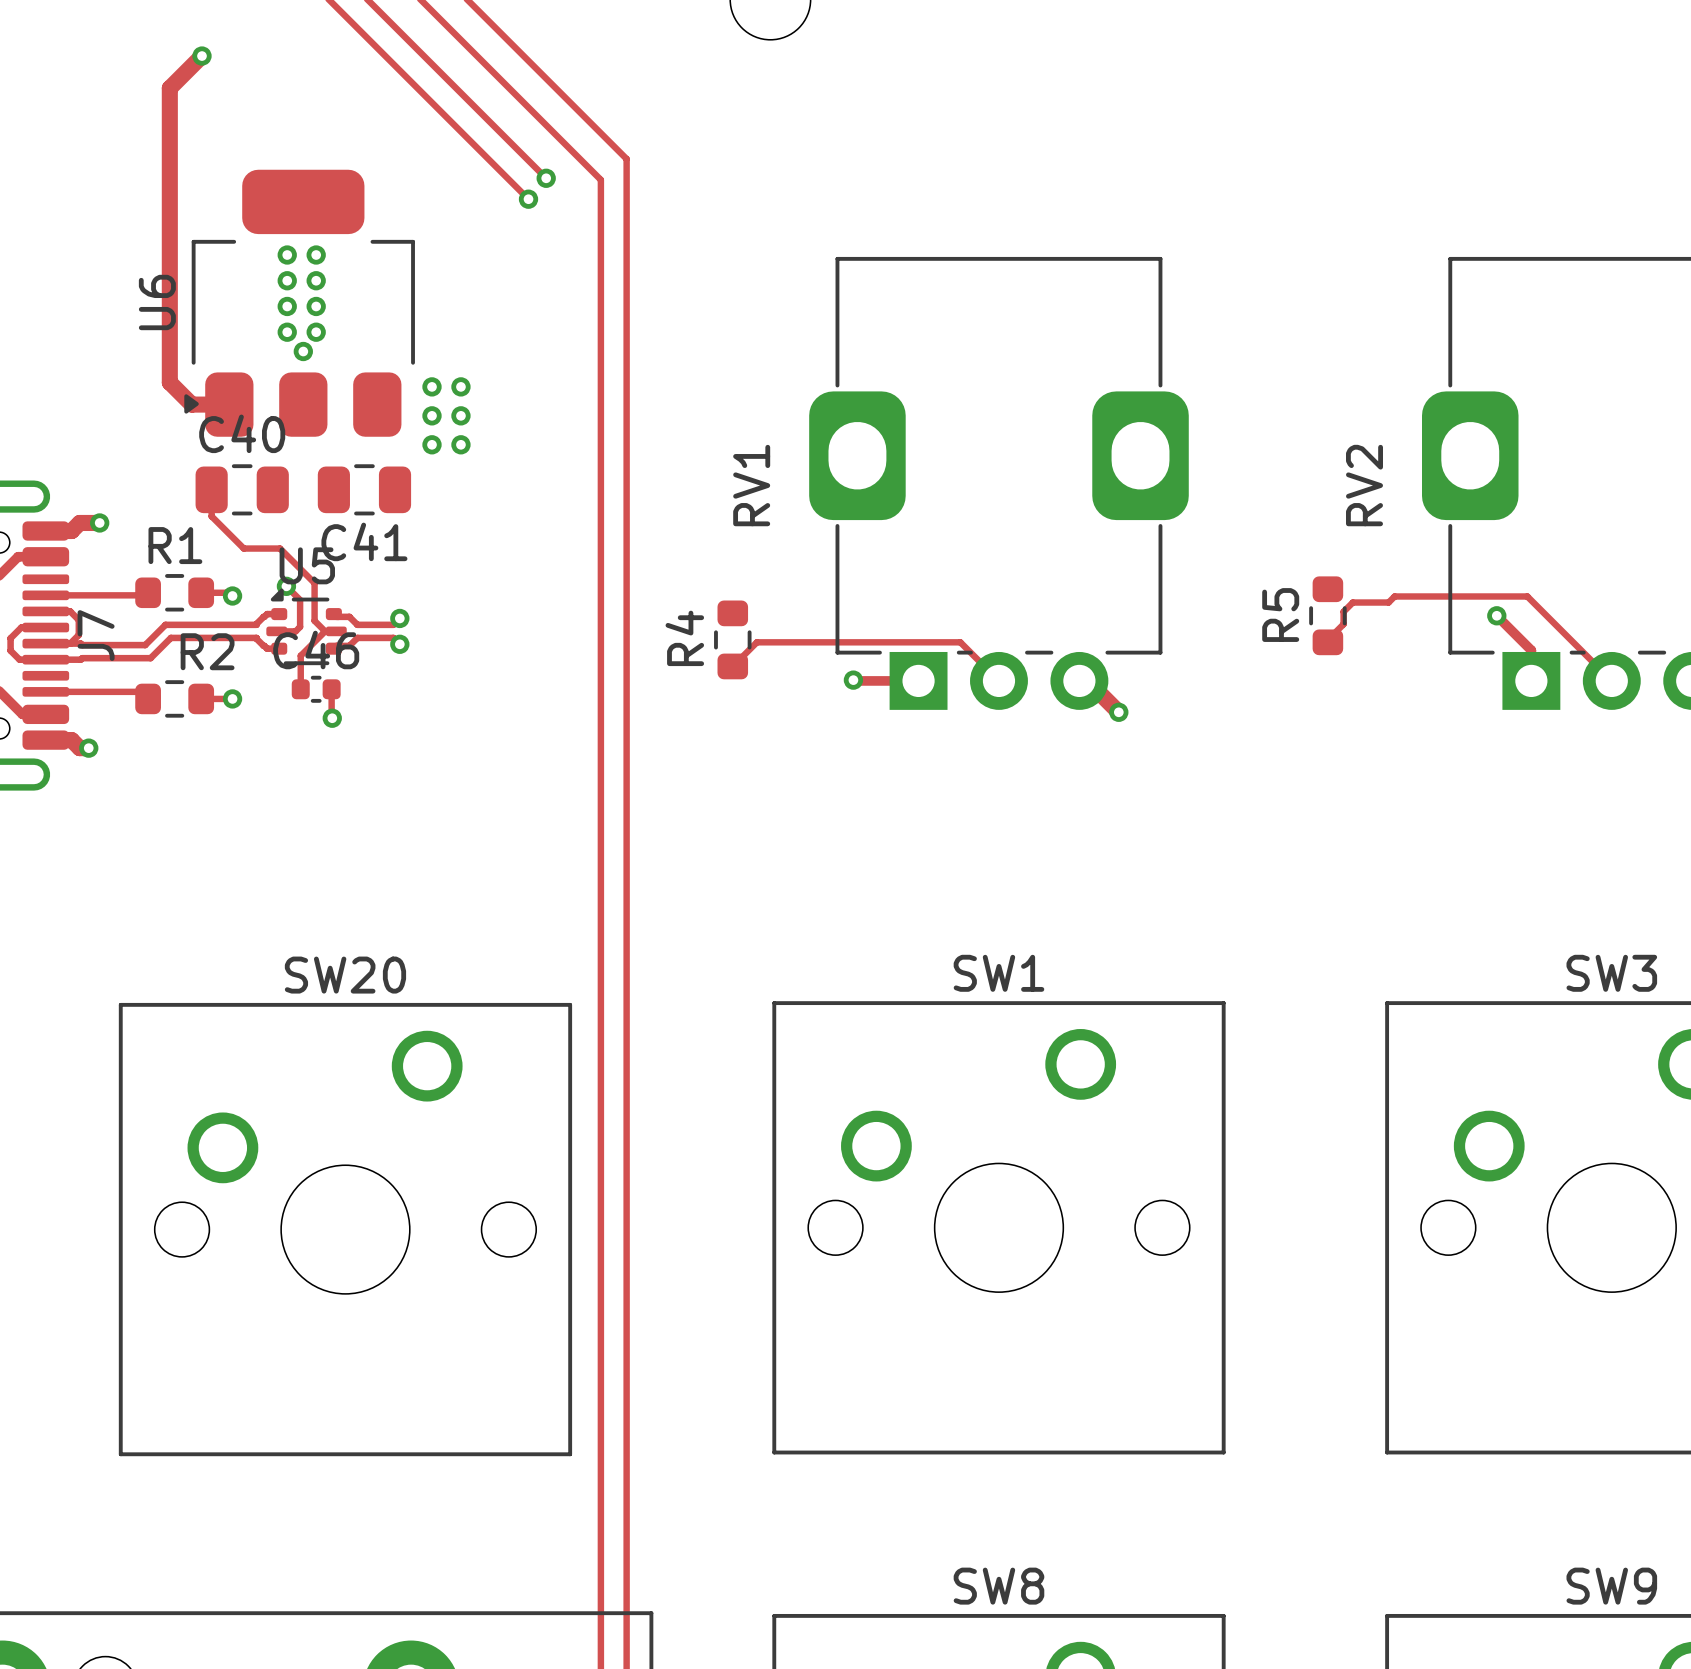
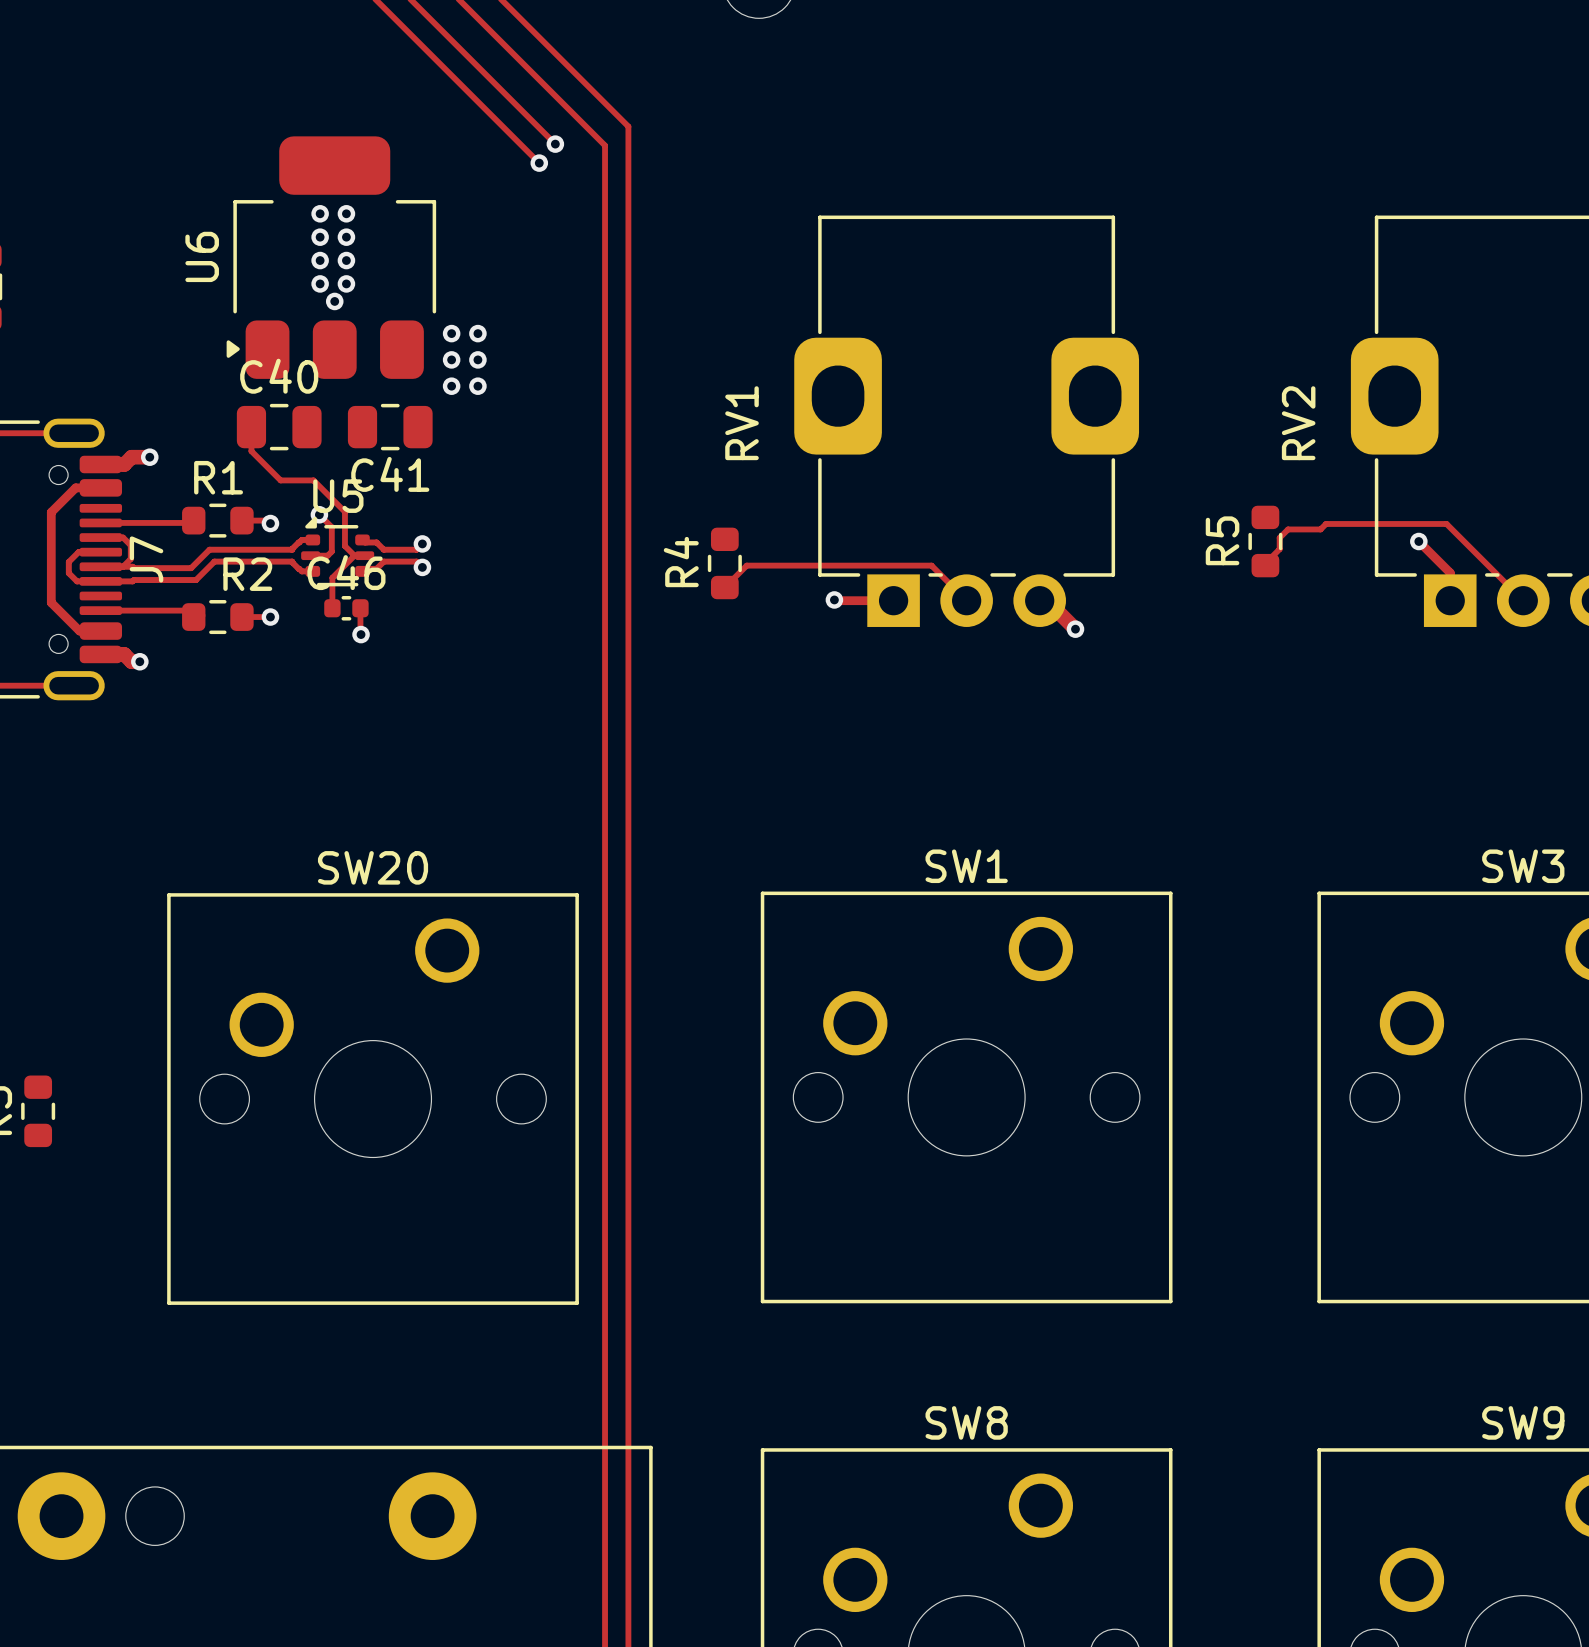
track: (201, 56) (169, 88) (169, 382) (191, 404) (229, 404) -> none
via: (201, 56) -> none

